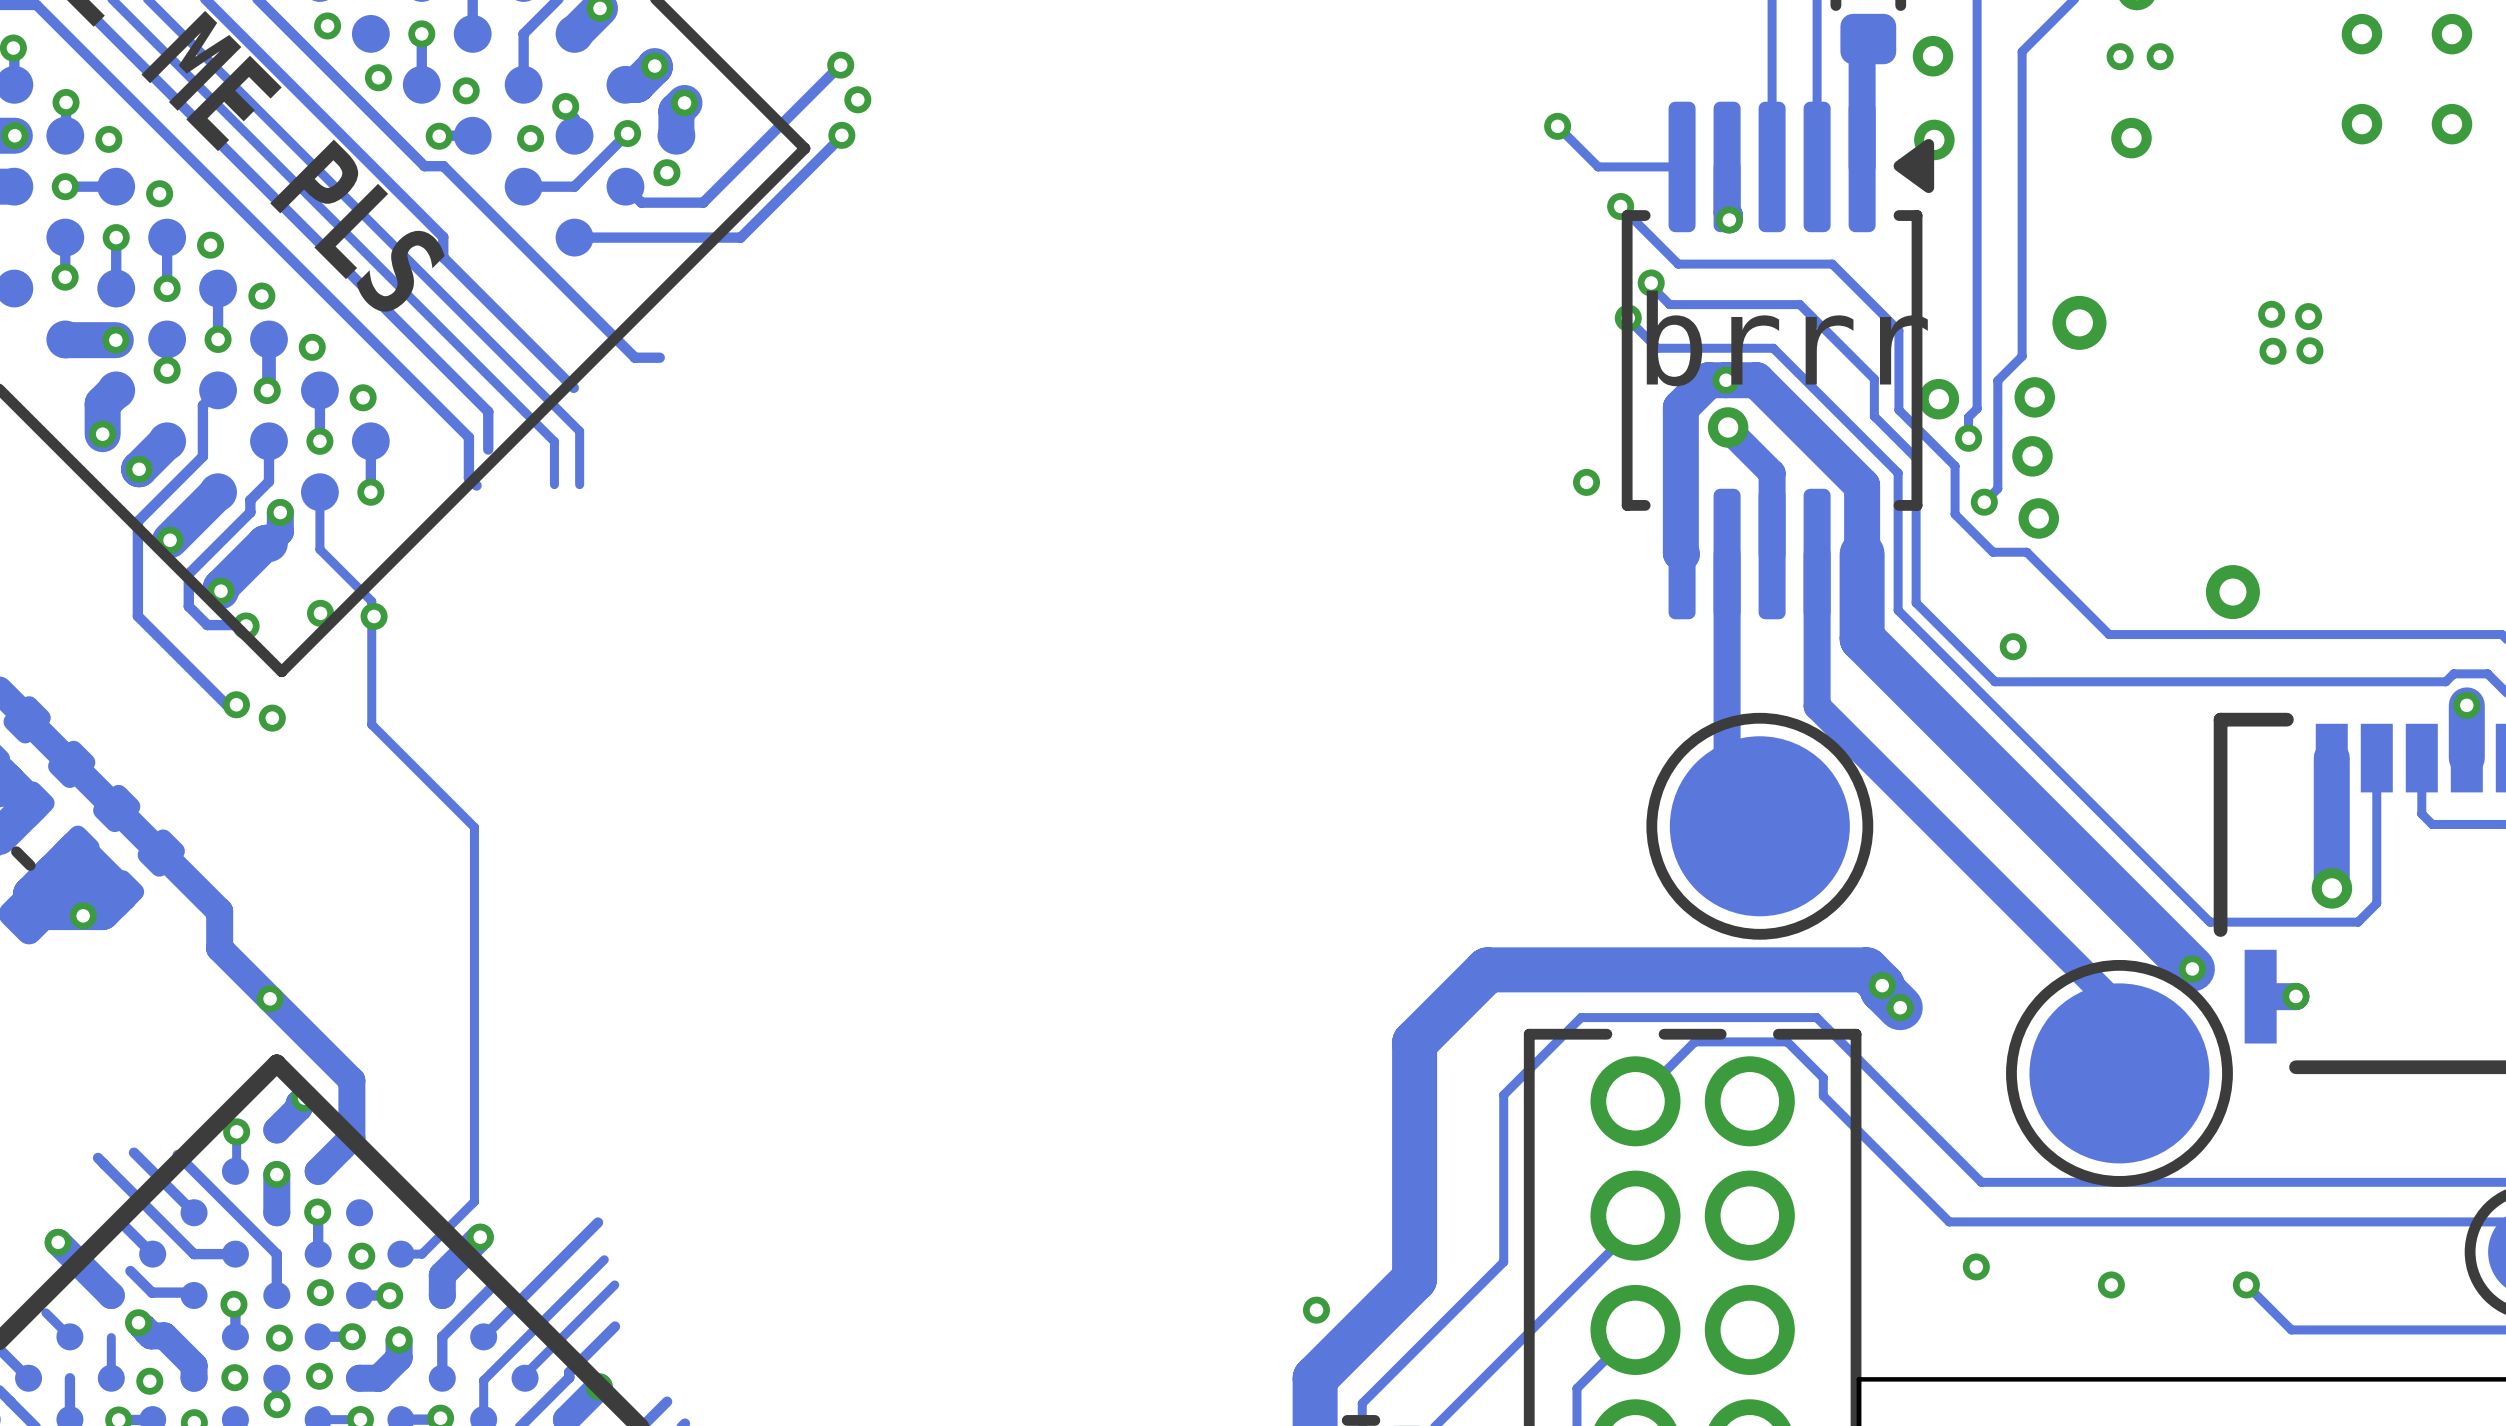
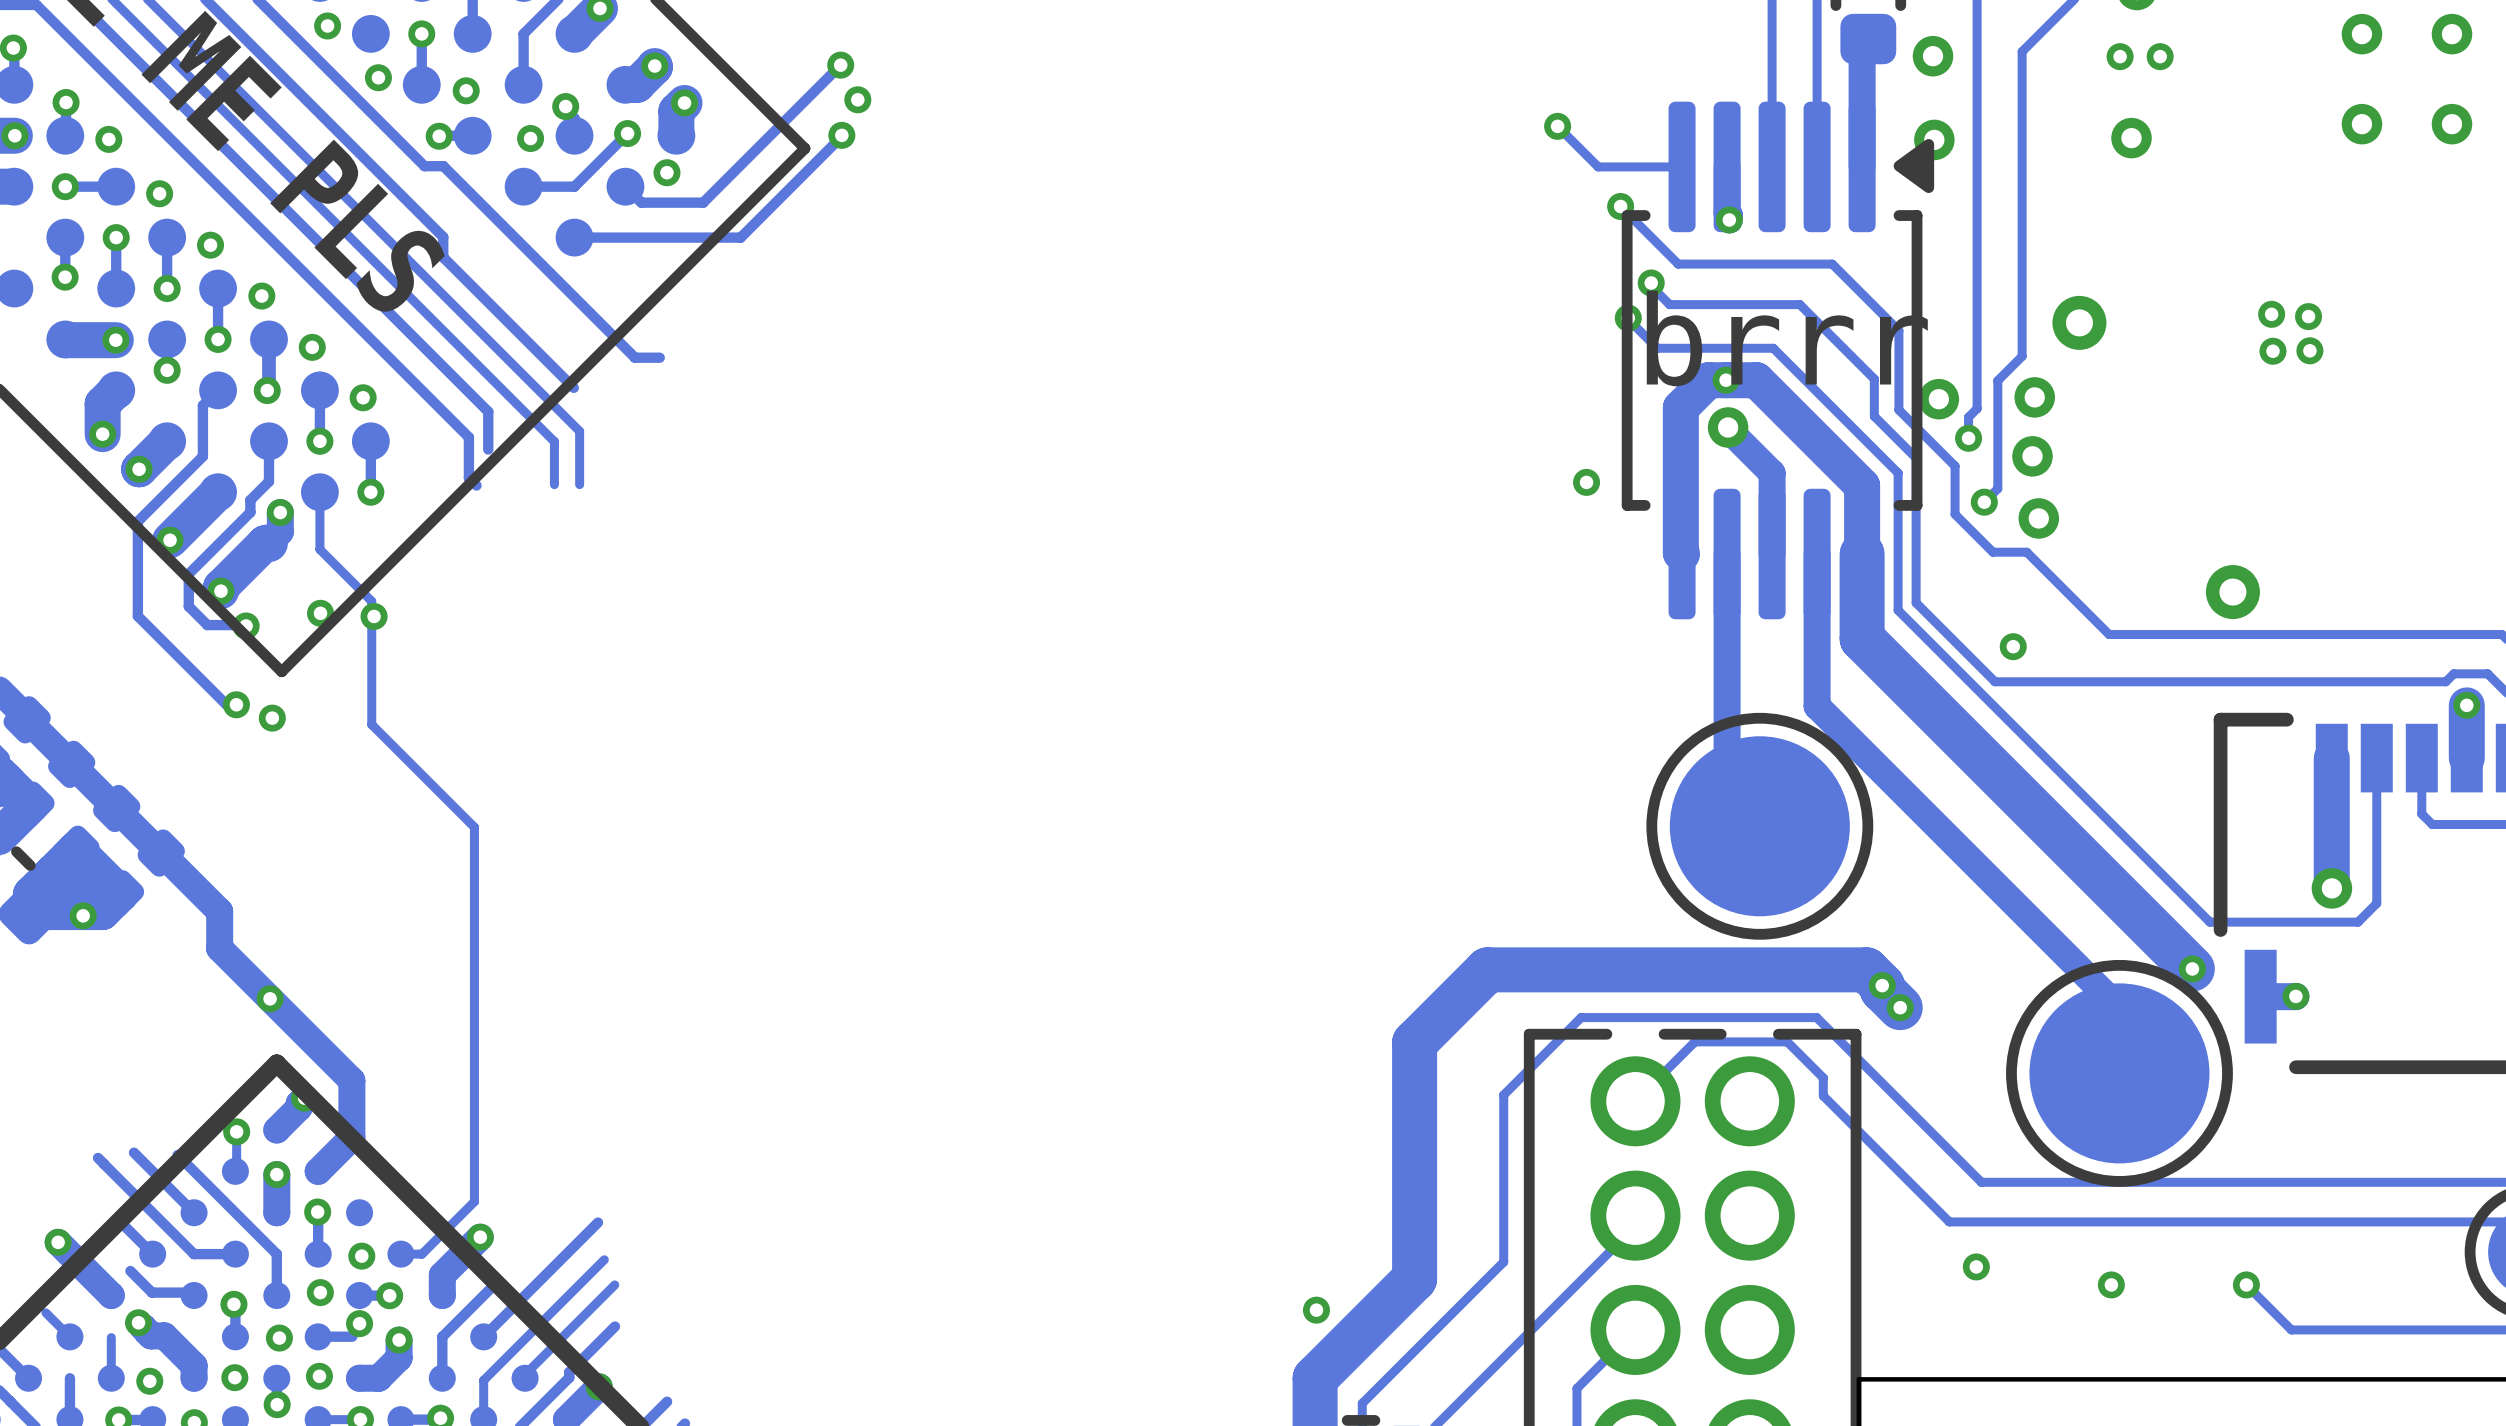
via position: (352, 1336) -> (359, 1323)

